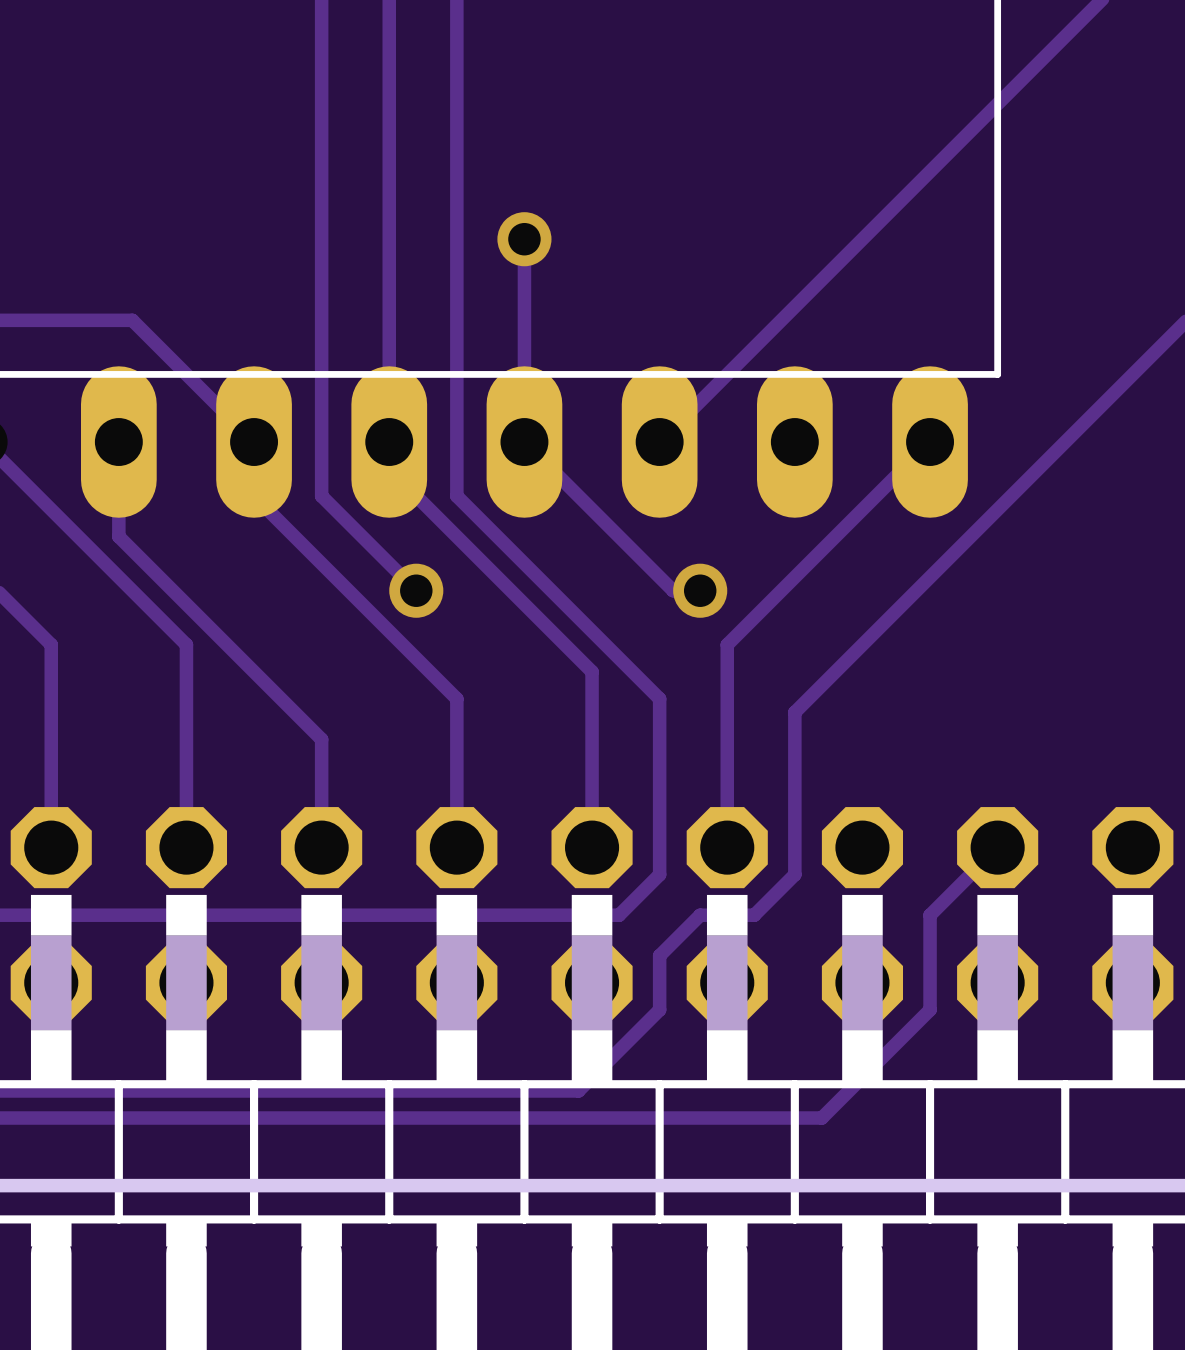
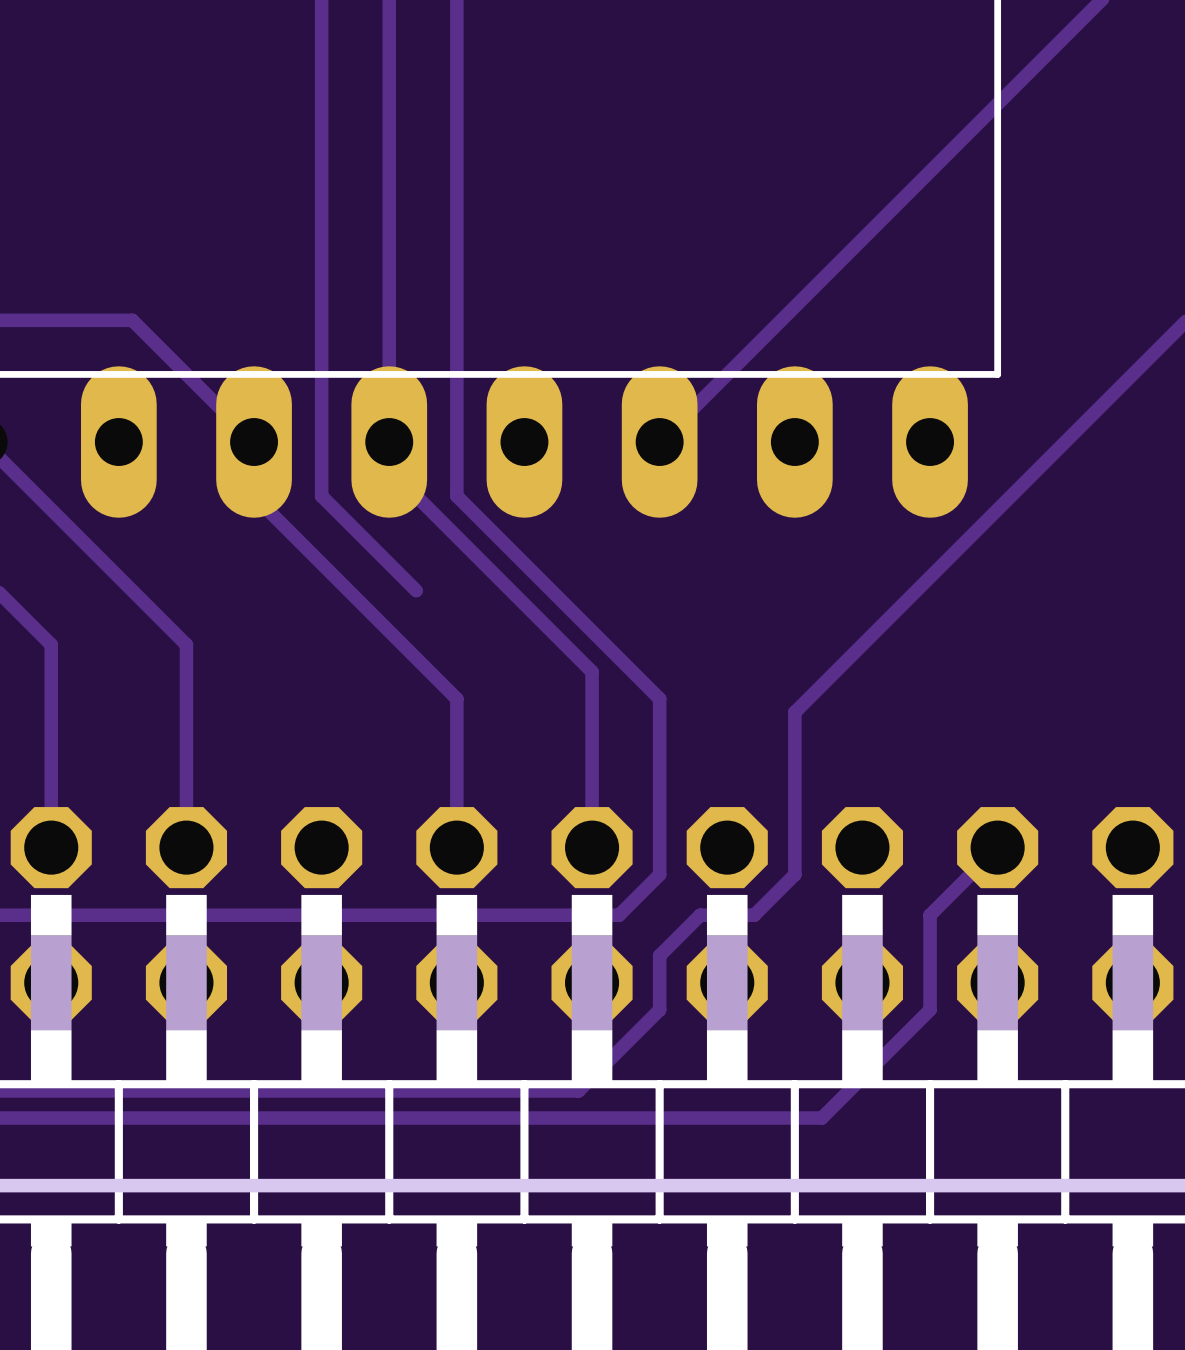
track: (524, 239) (524, 442) (673, 590) (700, 590) -> none
via: (524, 239) -> none
track: (118, 442) (118, 536) (321, 739) (321, 847) -> none
track: (930, 442) (727, 644) (727, 847) -> none
via: (416, 590) -> none
via: (700, 590) -> none

